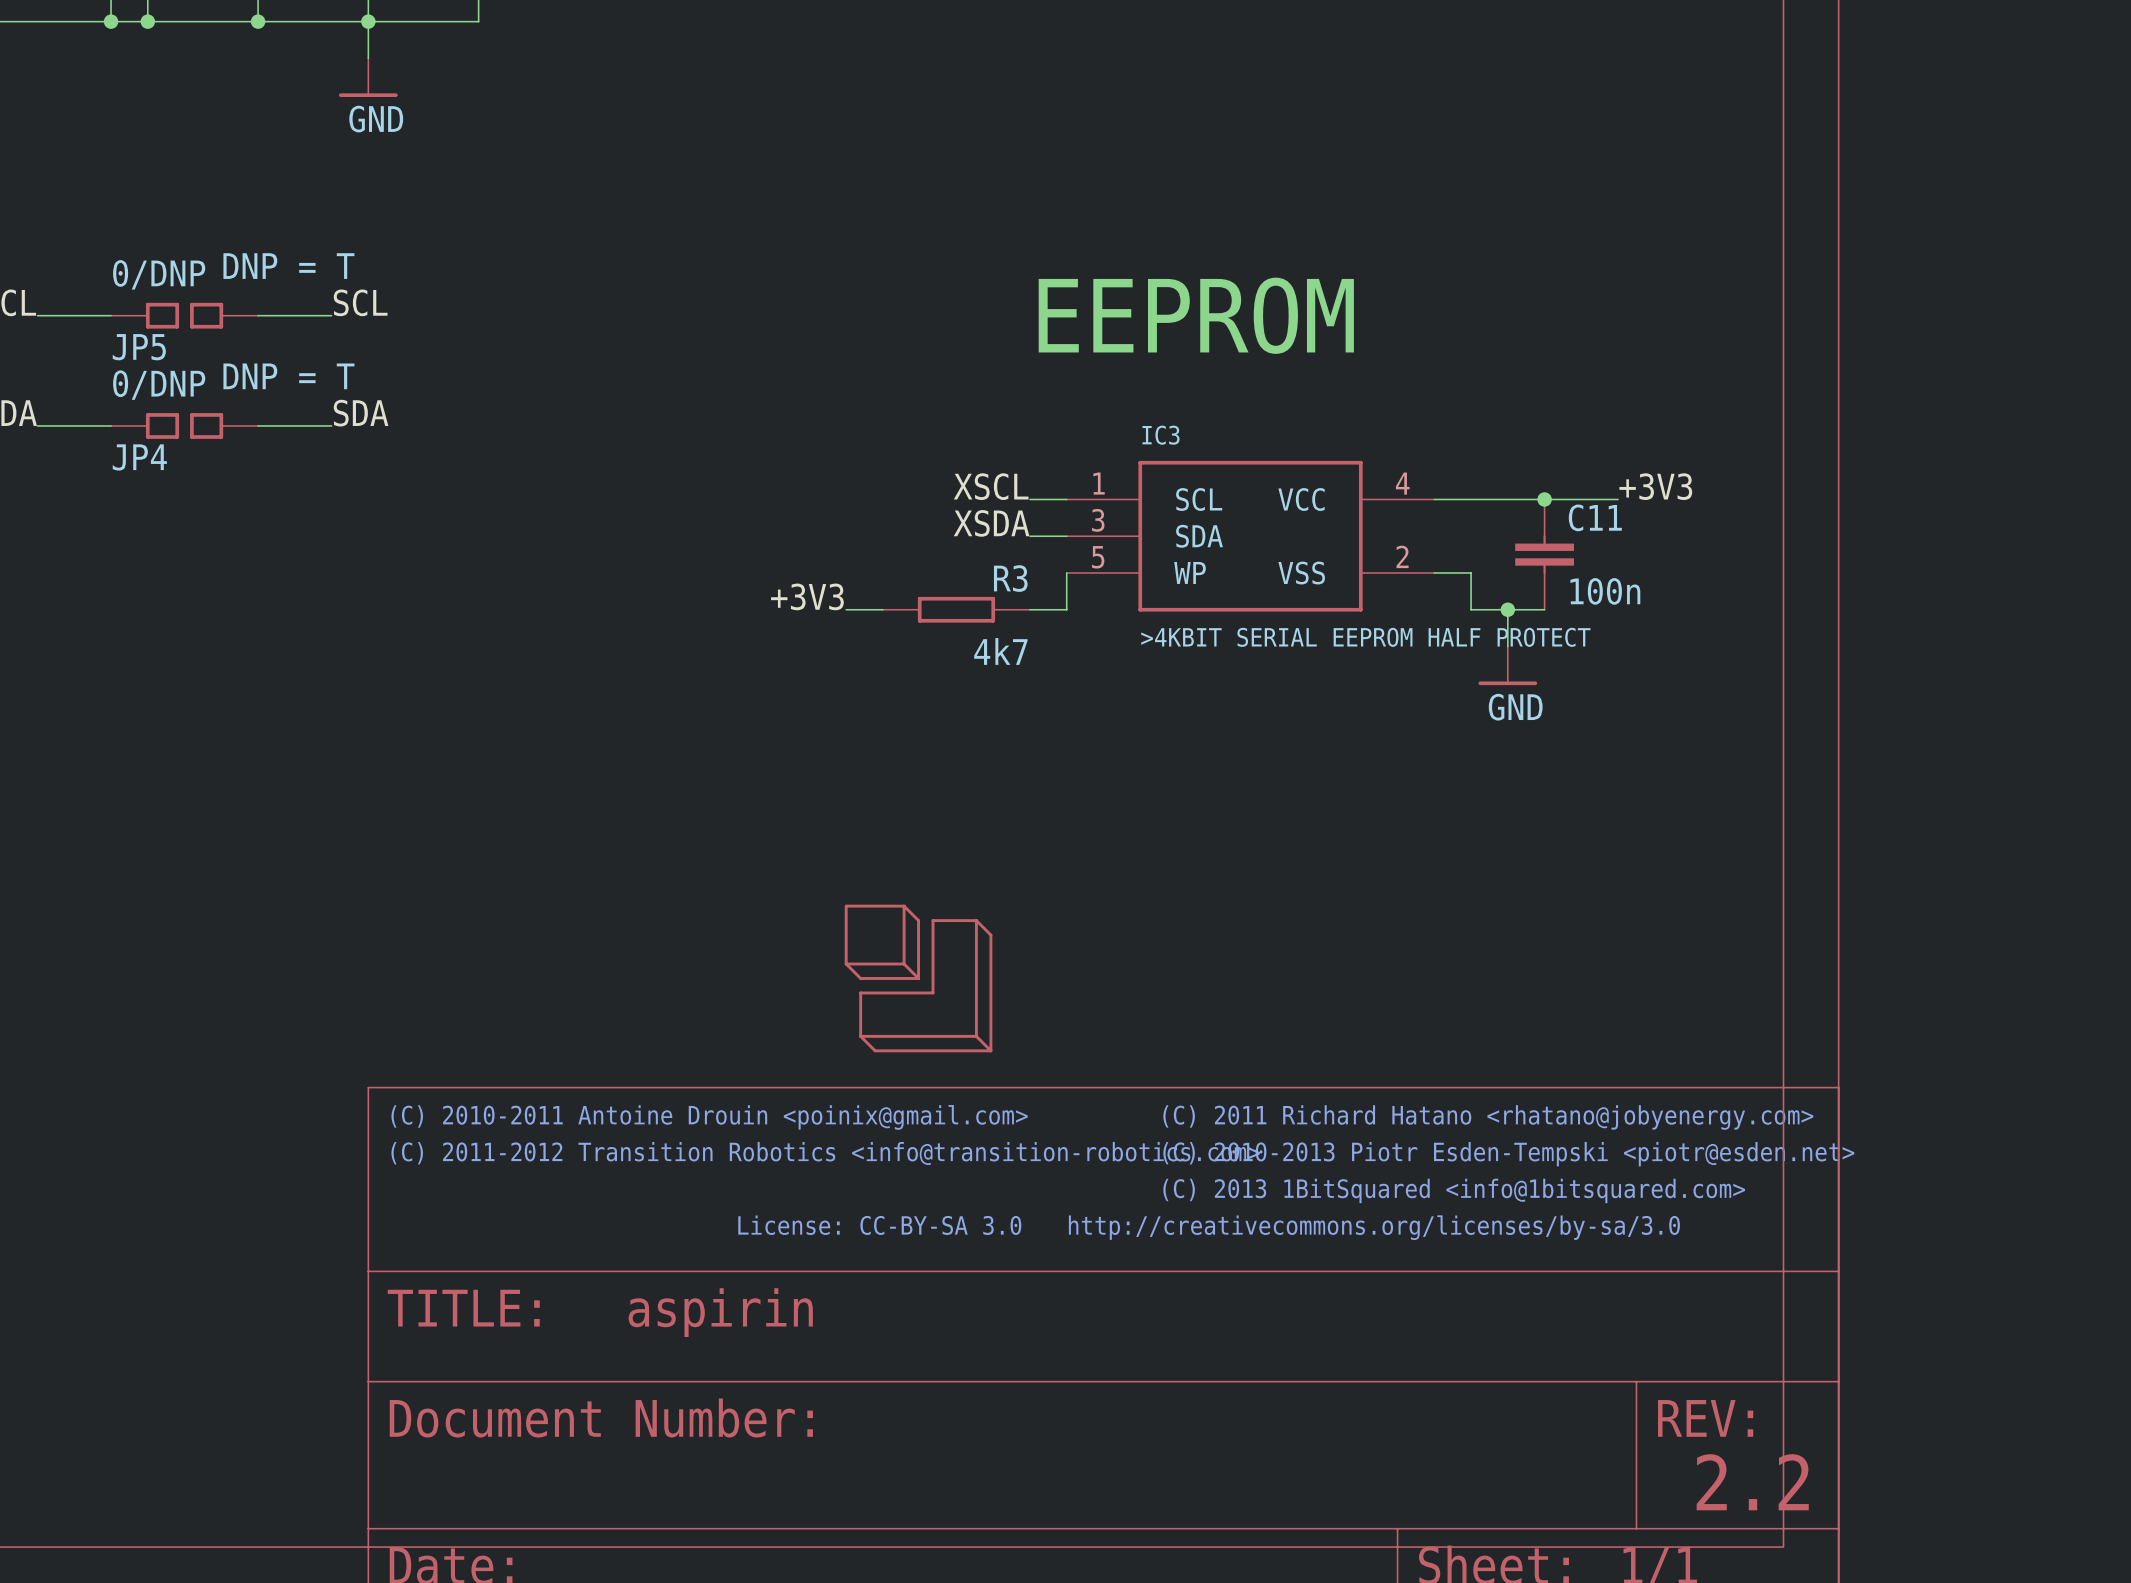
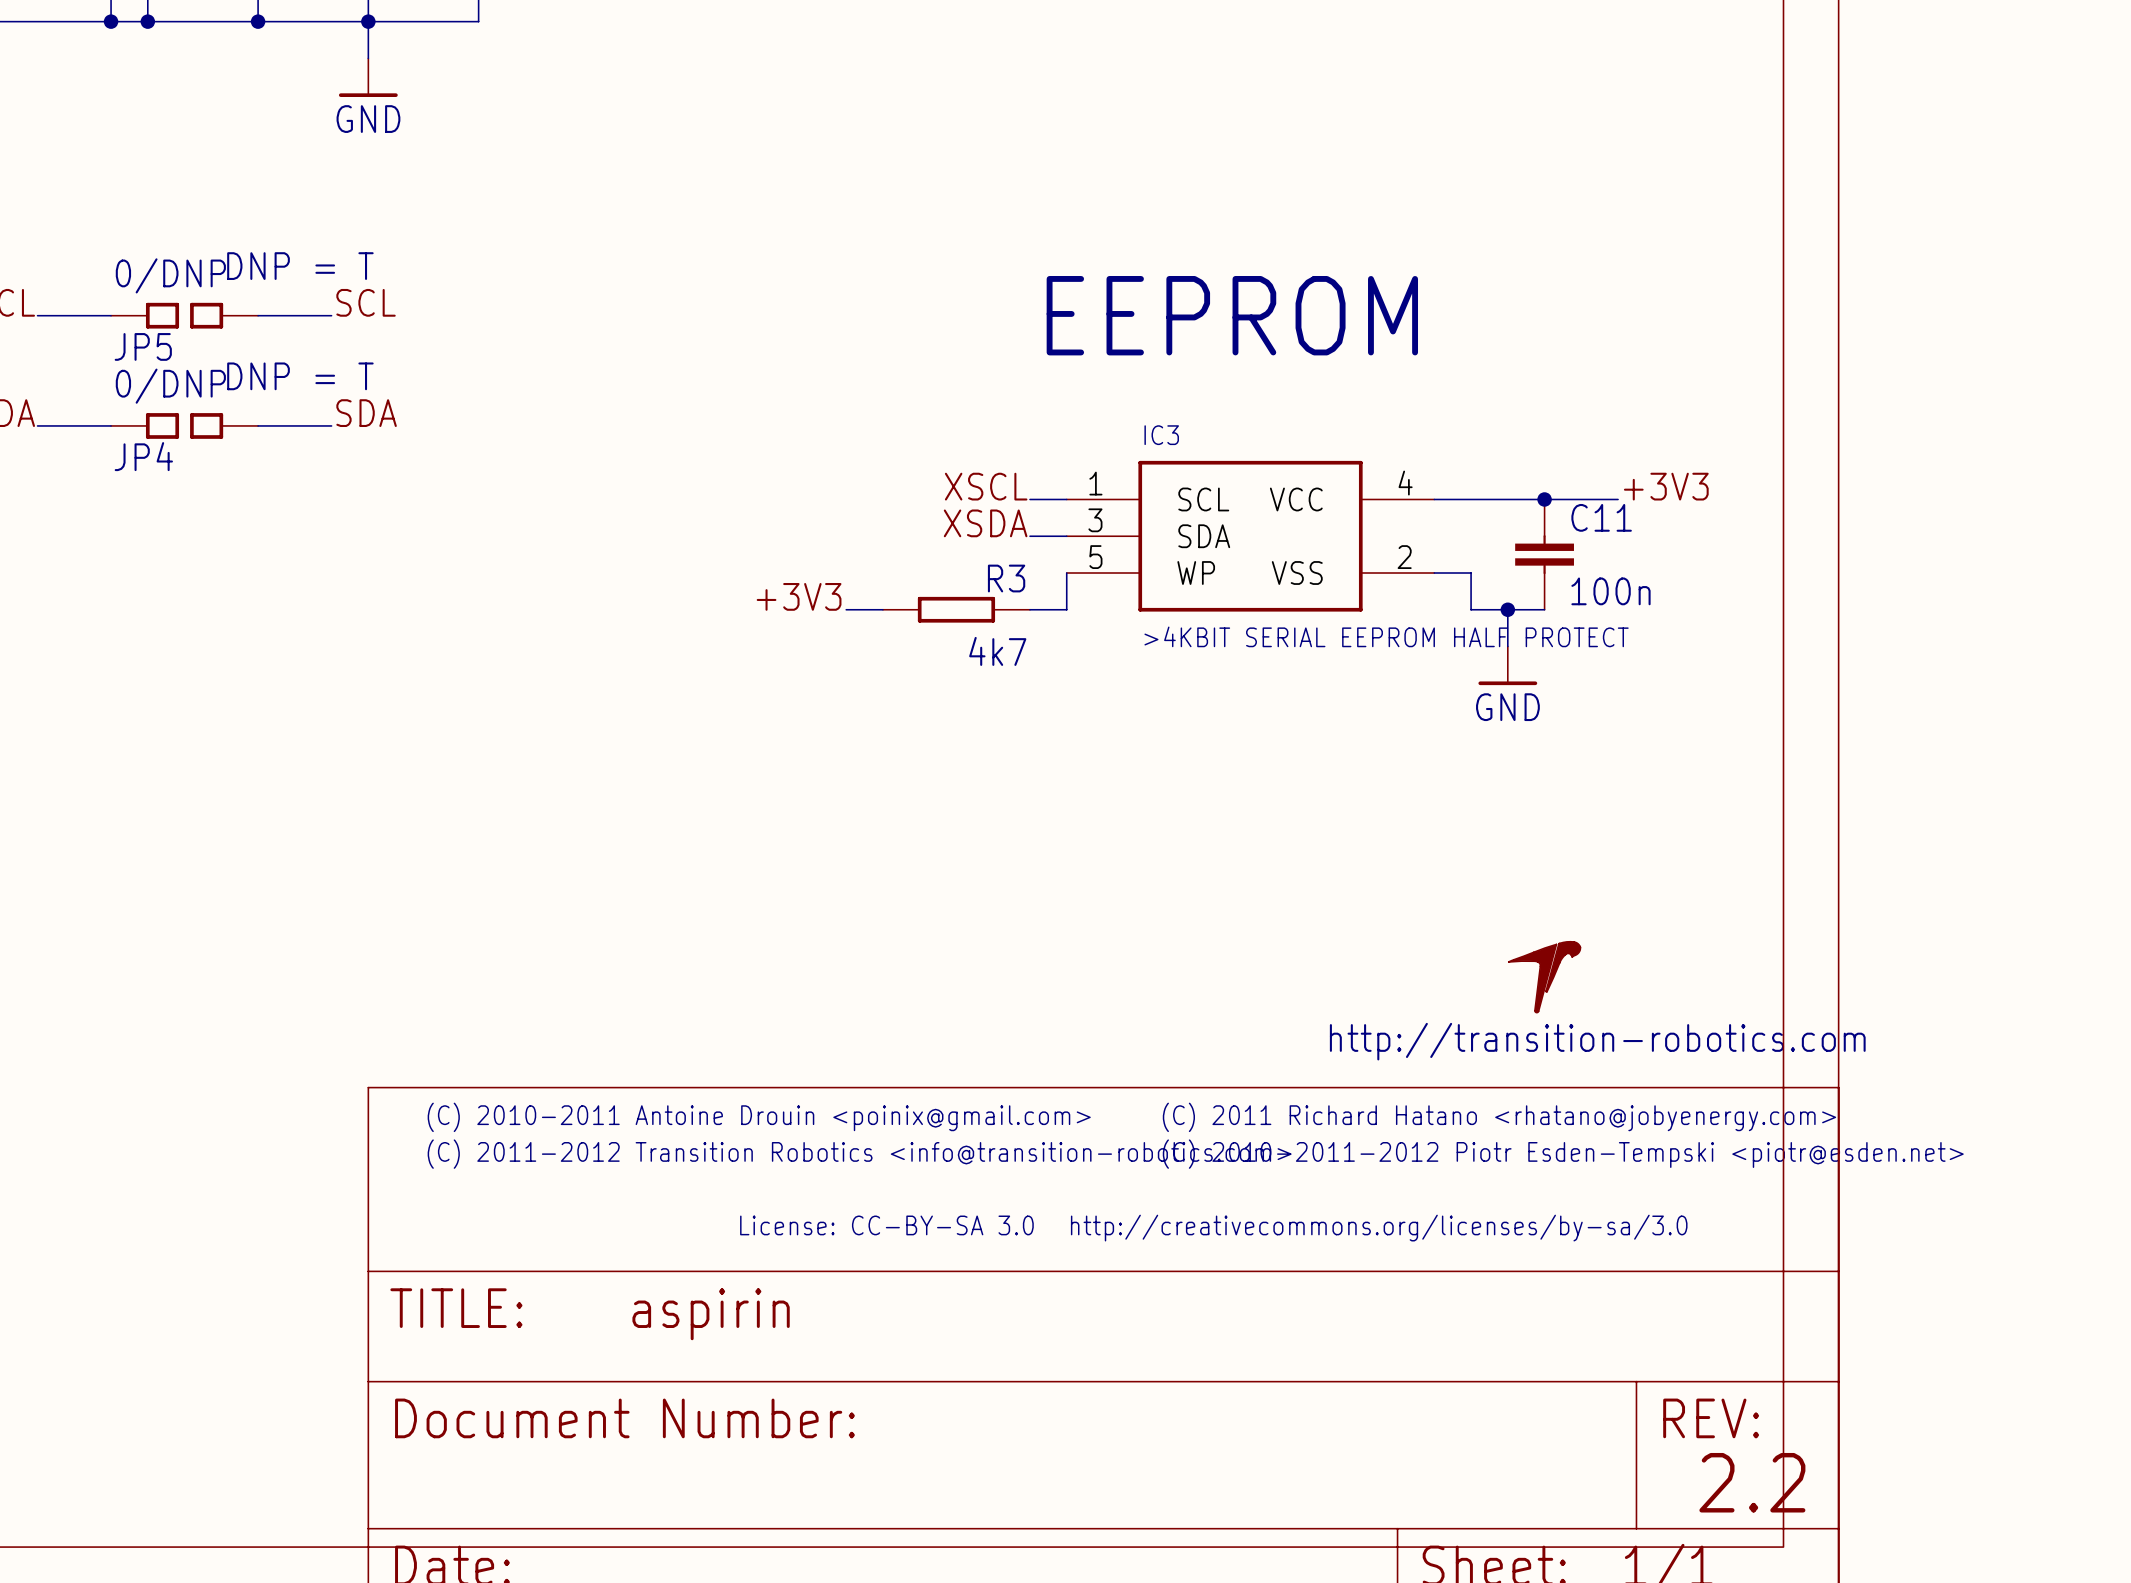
part: none -> (1544, 977)
part: (918, 978) -> none
text: none -> http://transition-robotics.com (1597, 1041)
text position: (C) 2010-2011 Antoine Drouin <poinix@gmail.com> (709, 1117) -> (C) 2010-2011 Antoine Drouin <poinix@gmail.com> (759, 1117)
text position: (C) 2011-2012 Transition Robotics <info@transition-robotics.com> (825, 1153) -> (C) 2011-2012 Transition Robotics <info@transition-robotics.com> (859, 1154)
text: (C) 2010-2013 Piotr Esden-Tempski <piotr@esden.net> (1508, 1154) -> (C) 2010-2011-2012 Piotr Esden-Tempski <piotr@esden.net> (1563, 1154)
text: (C) 2013 1BitSquared <info@1bitsquared.com> (1454, 1190) -> none

